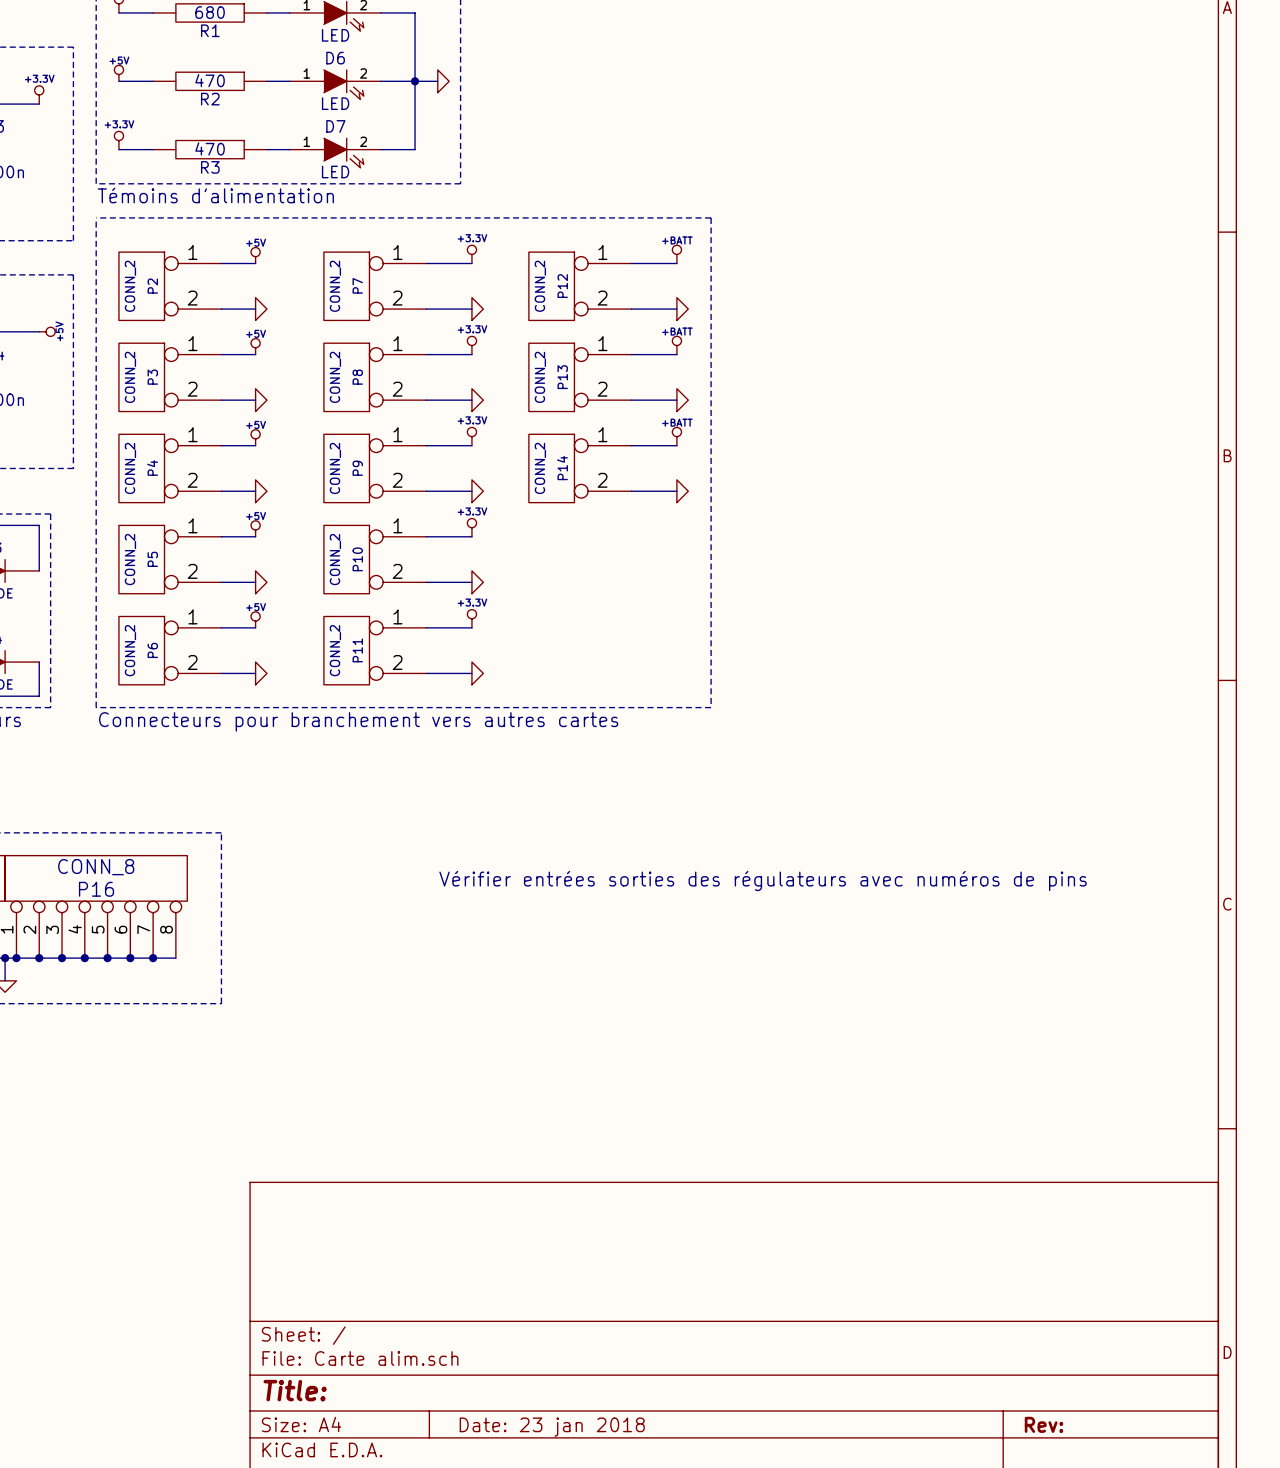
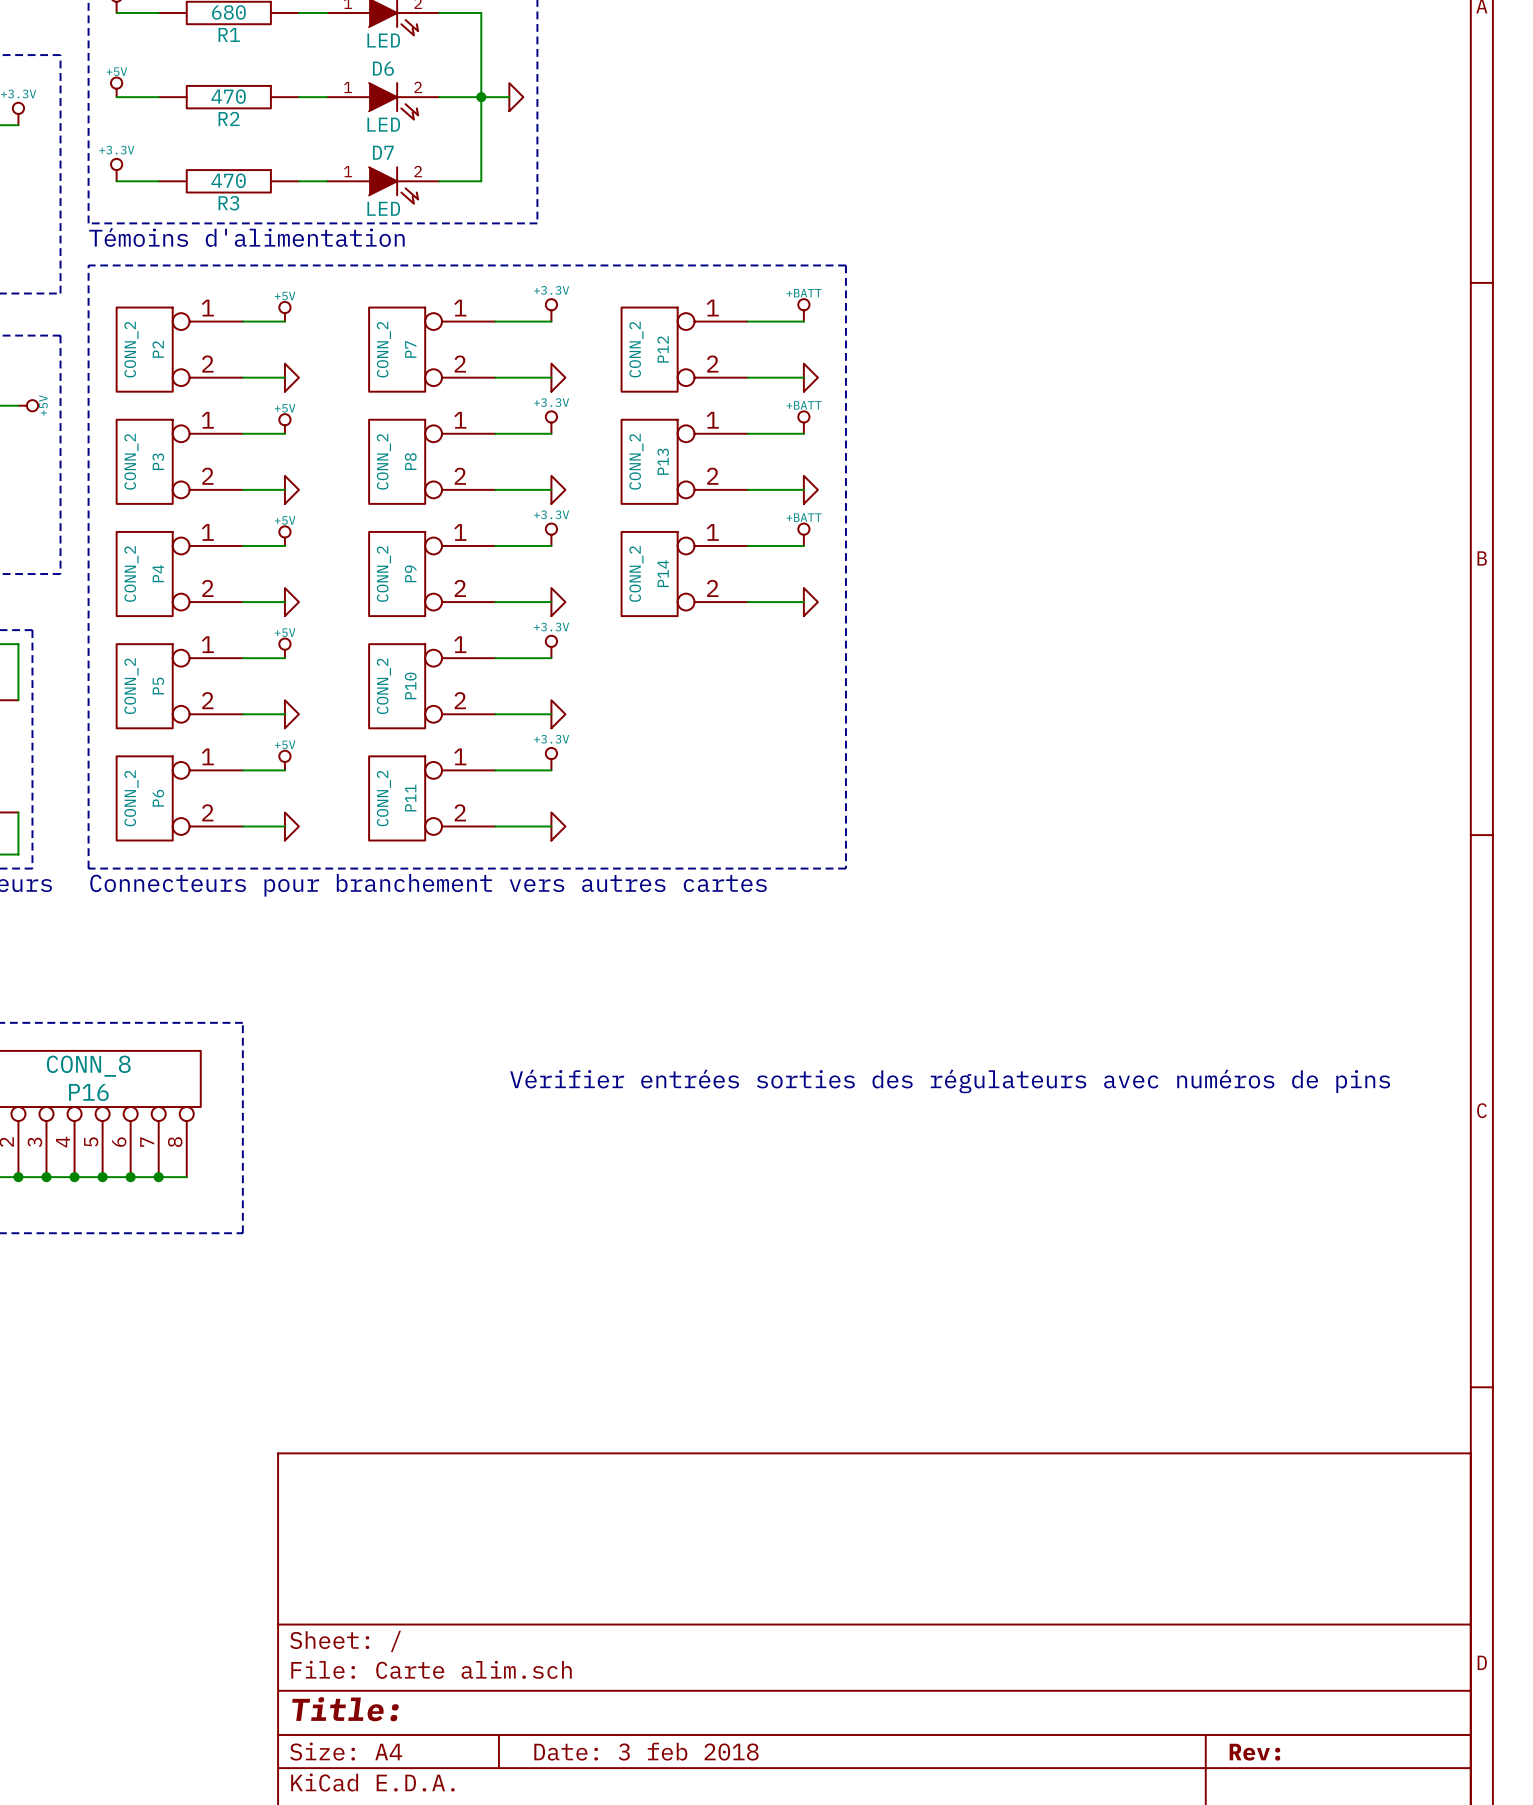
title block: Date: 23 jan 2018 (552, 1427) -> Date: 3 feb 2018 (646, 1751)

